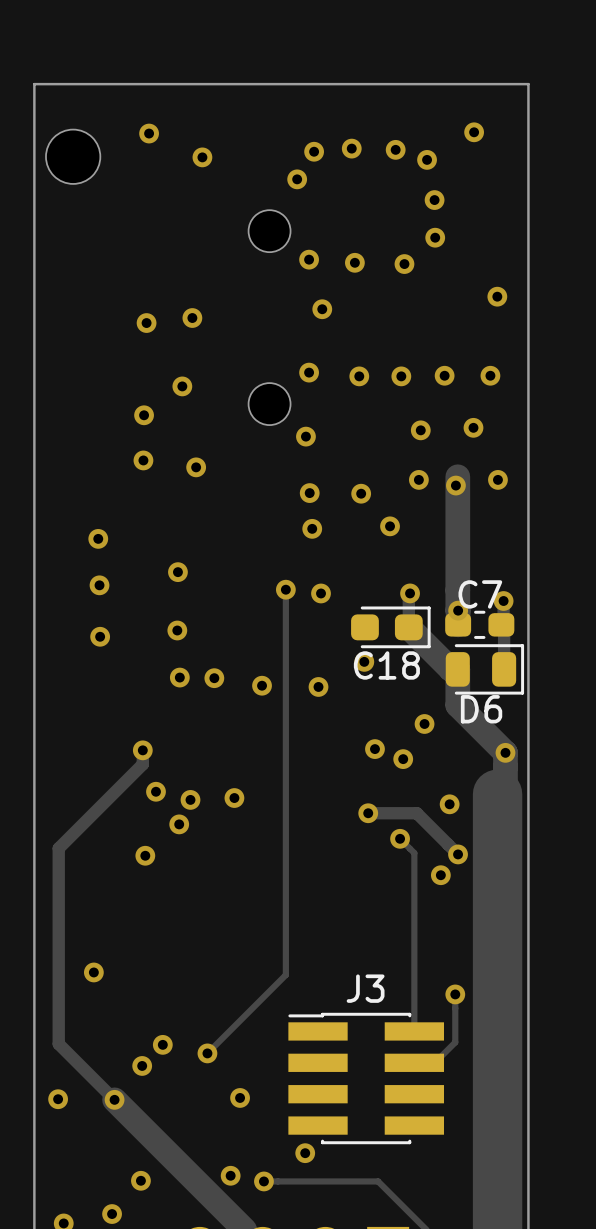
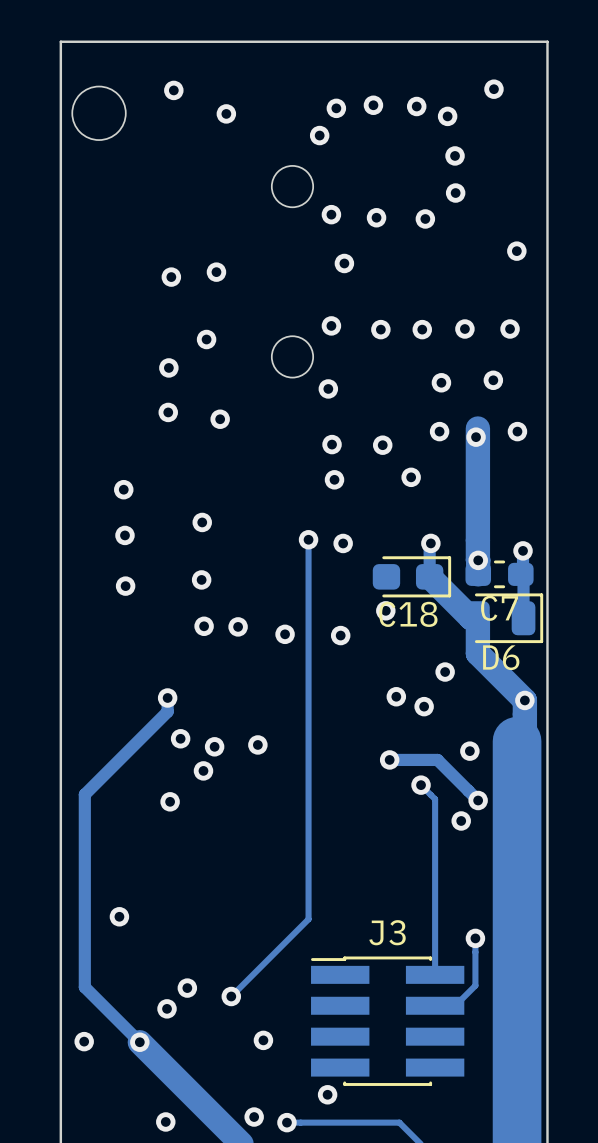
C7 name position: C7 (480, 594) -> C7 (499, 608)

